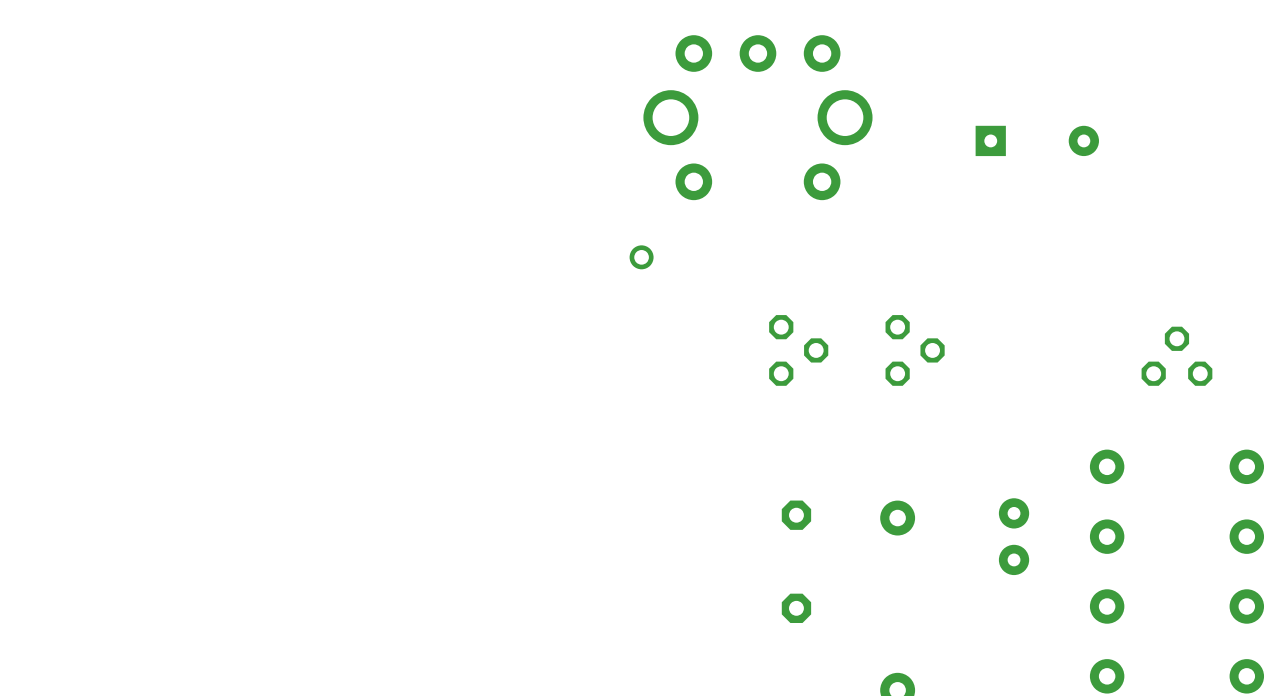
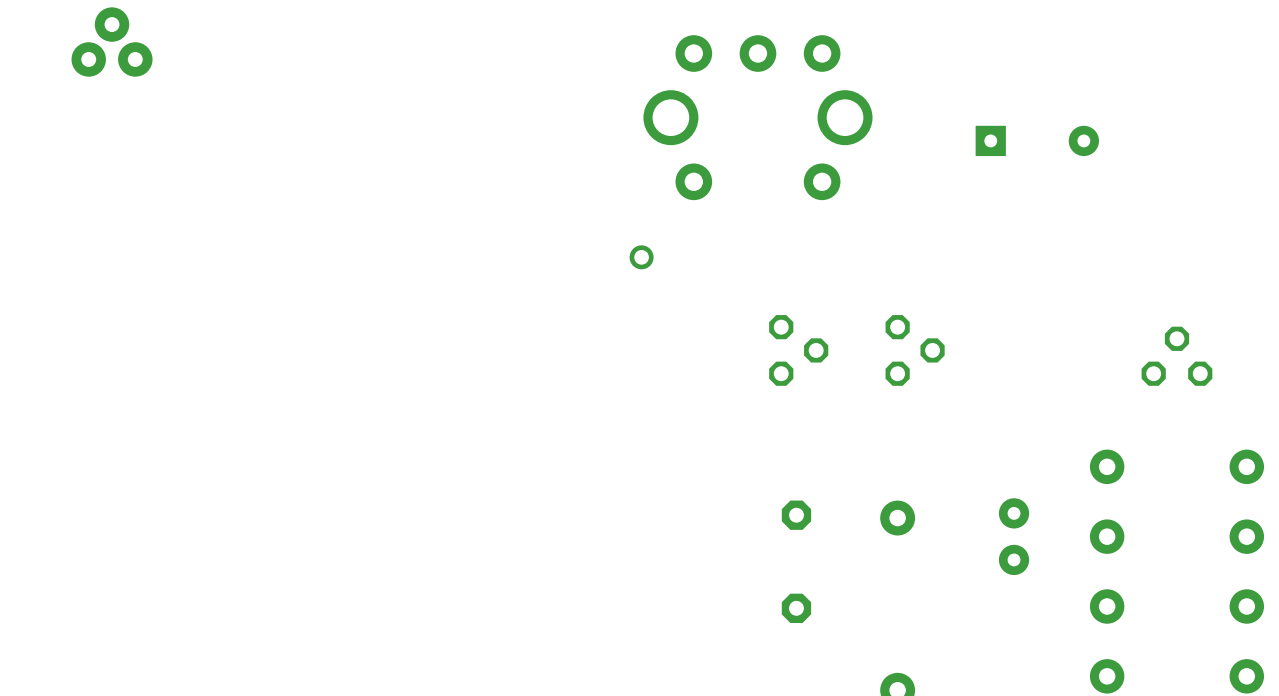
part: none -> (112, 42)

